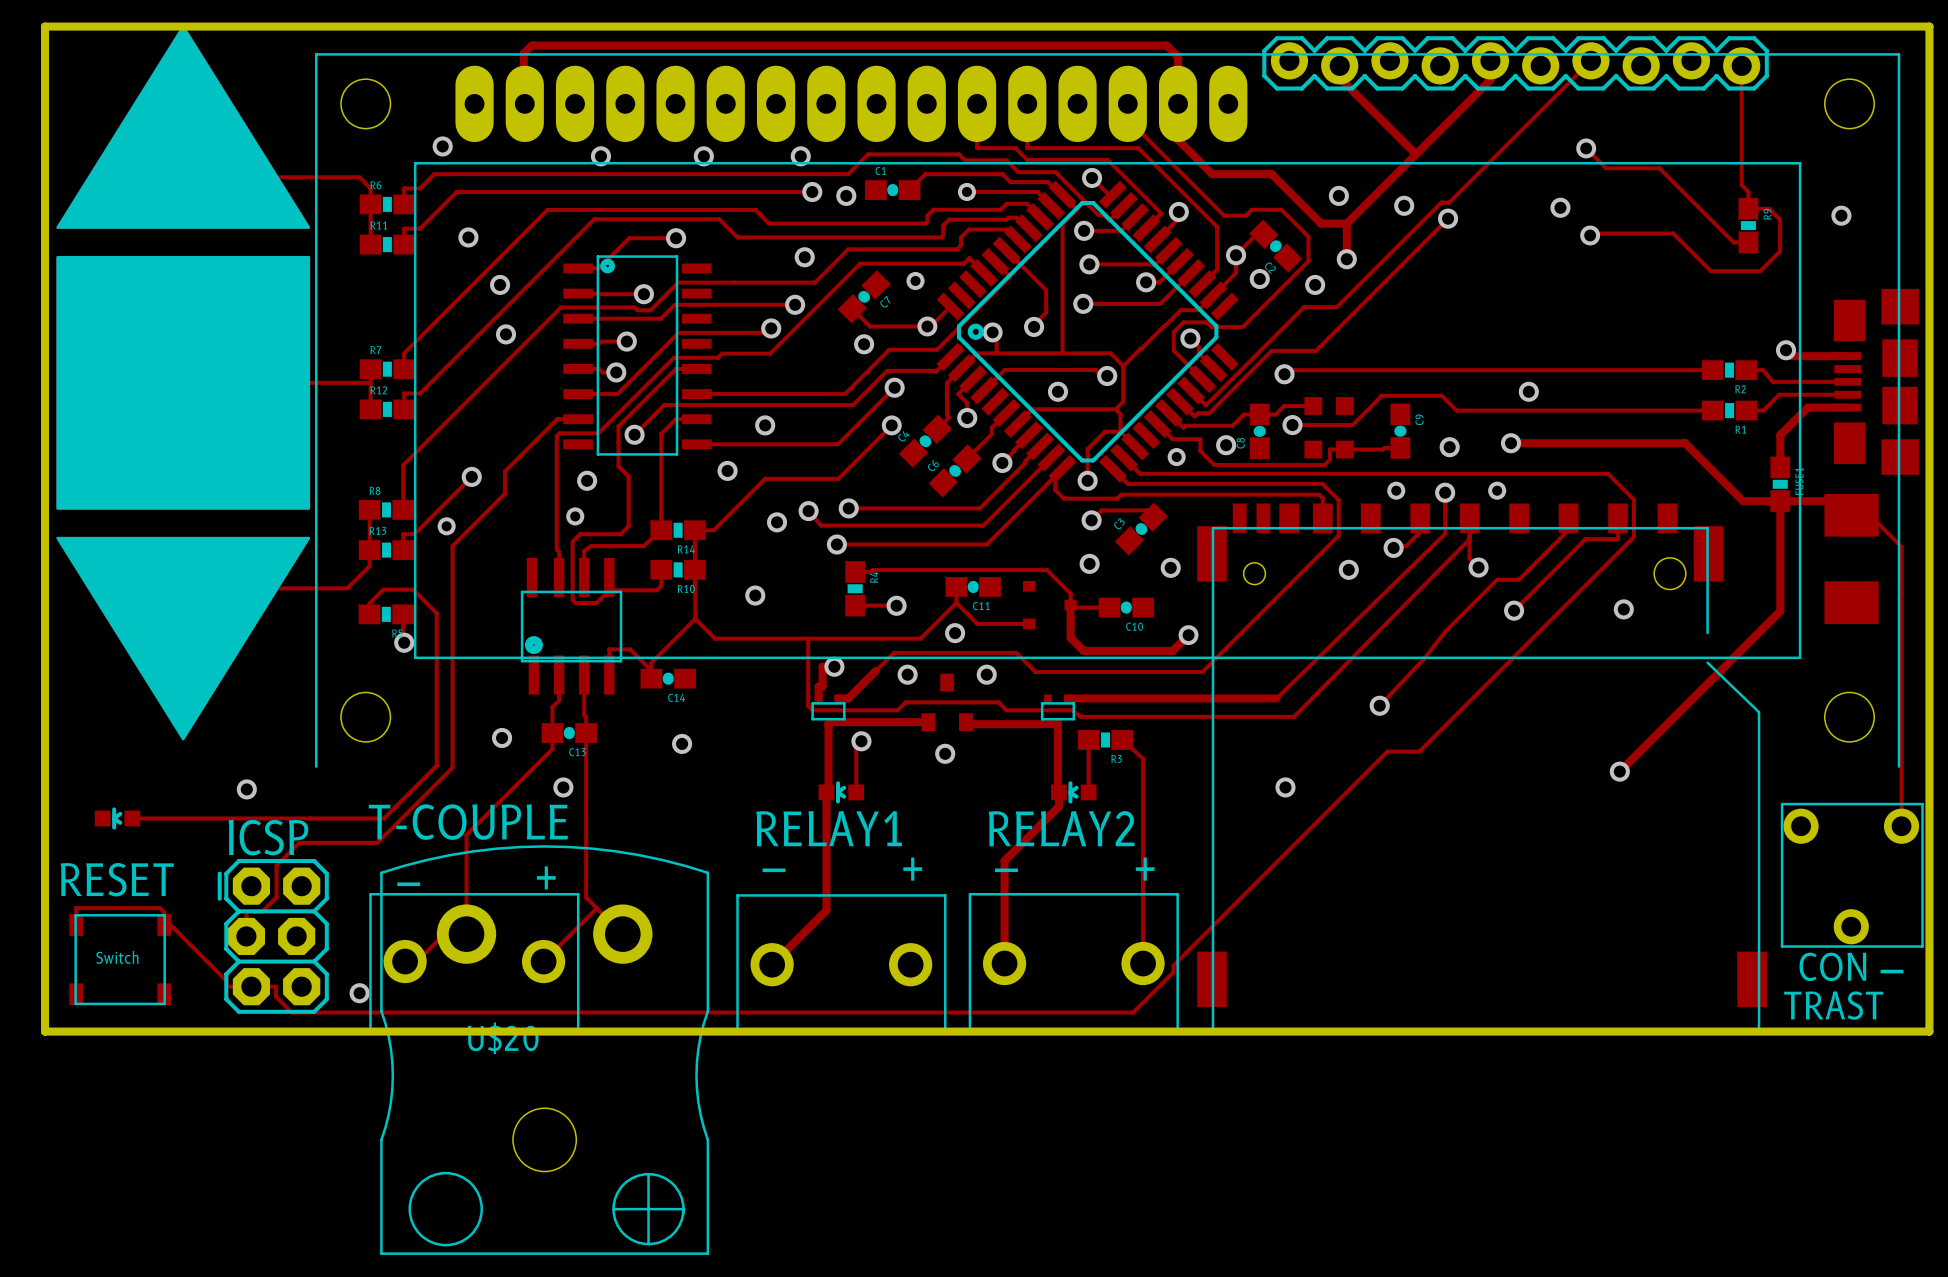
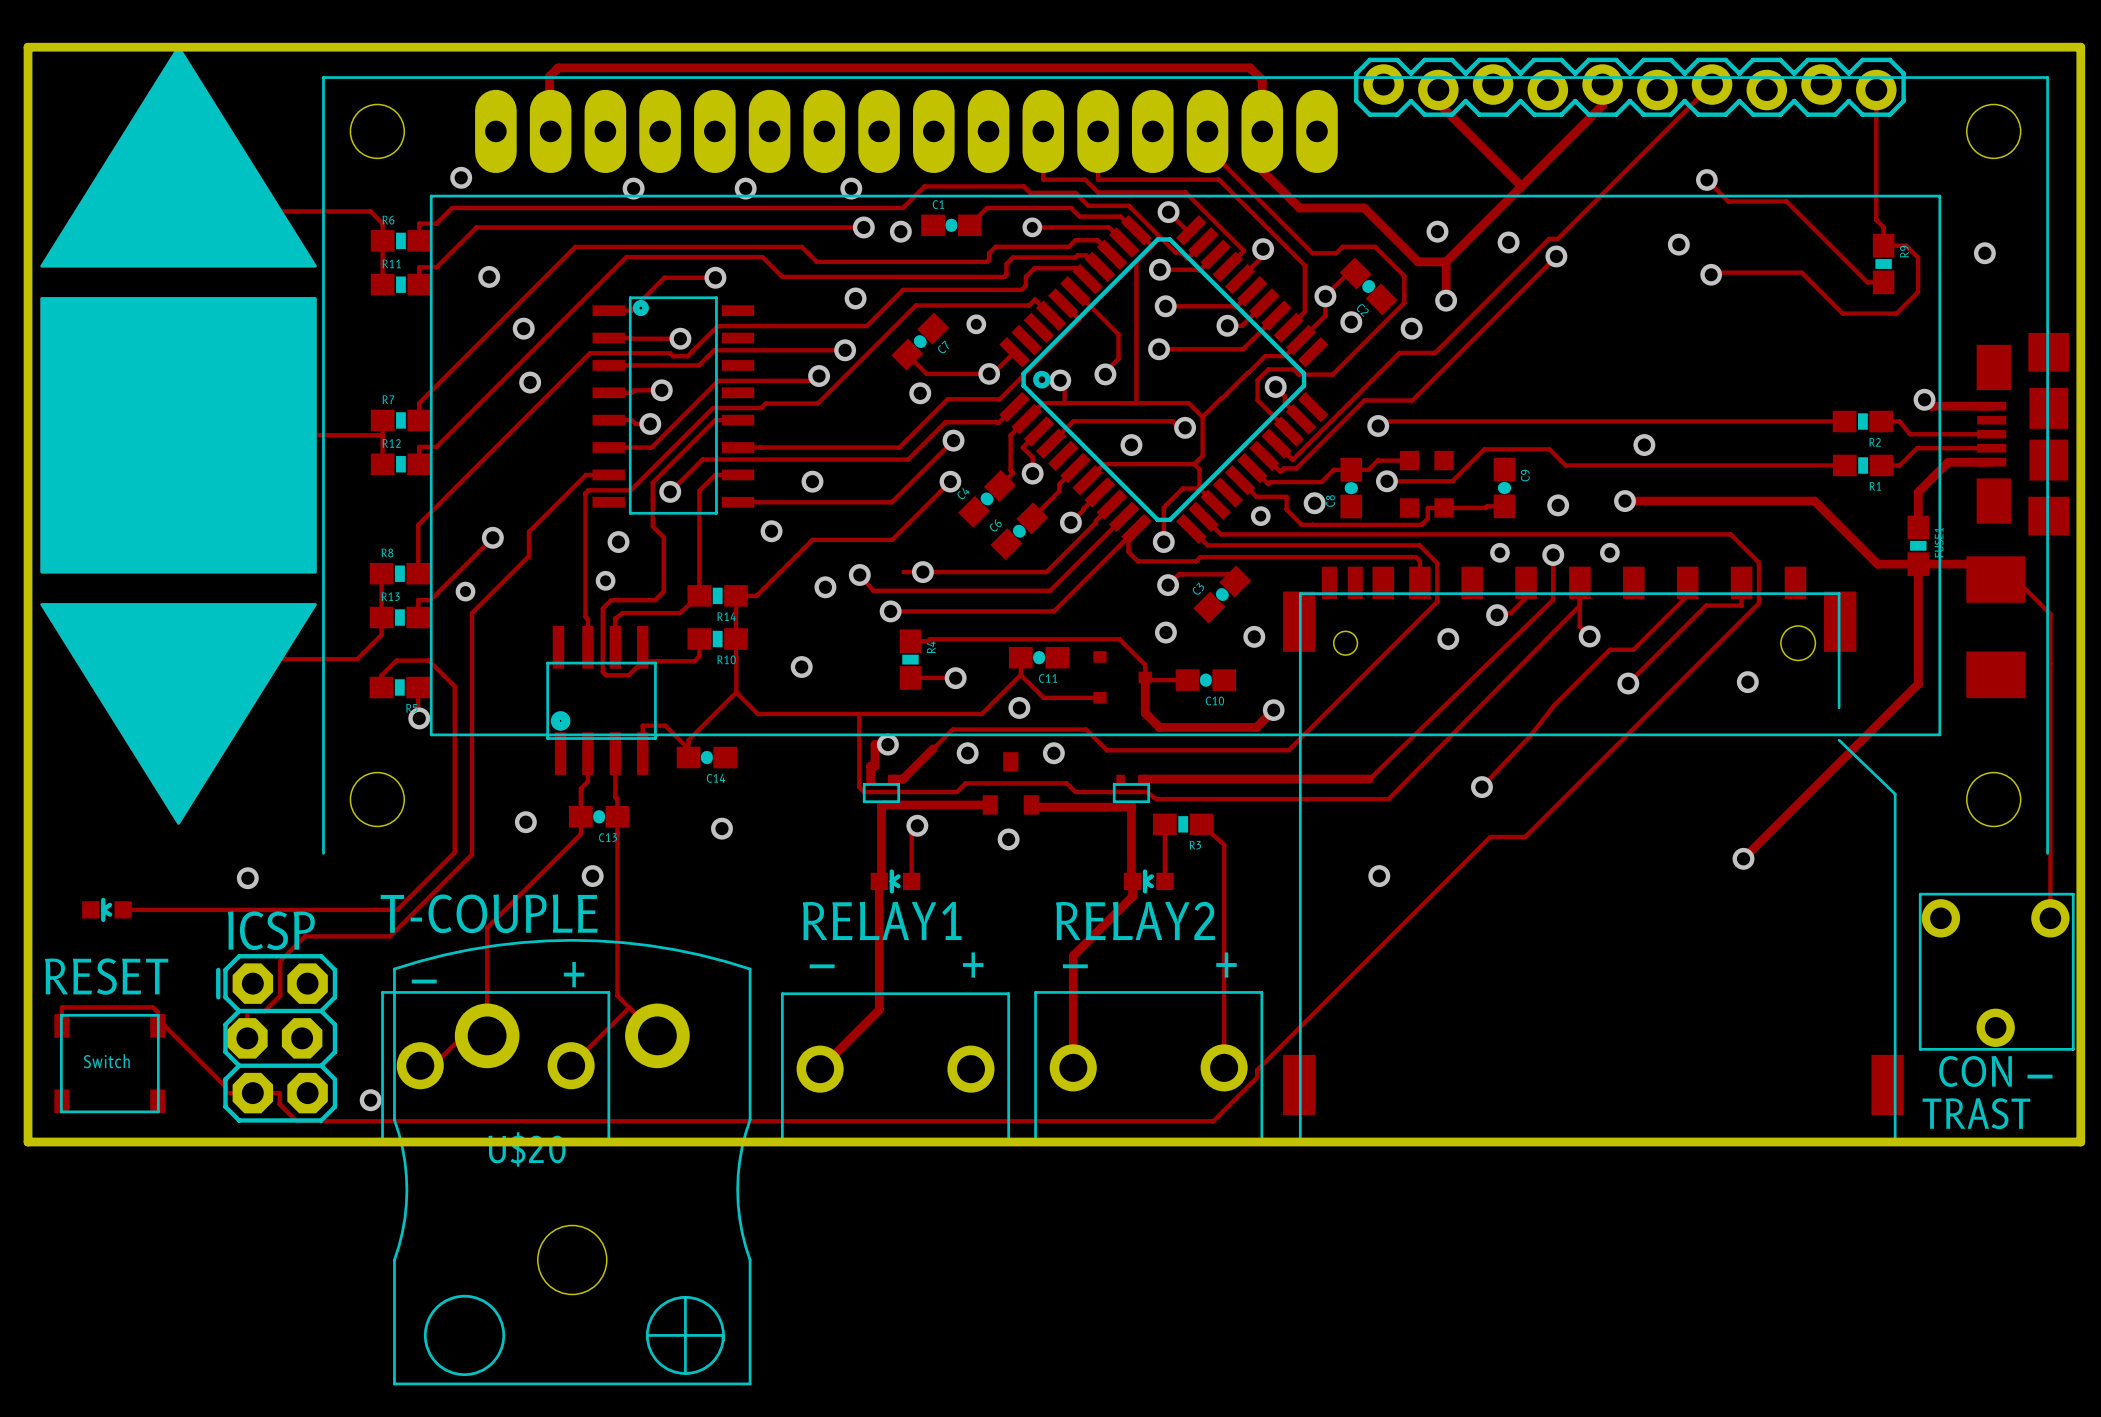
via position: (848, 508) -> (922, 572)

